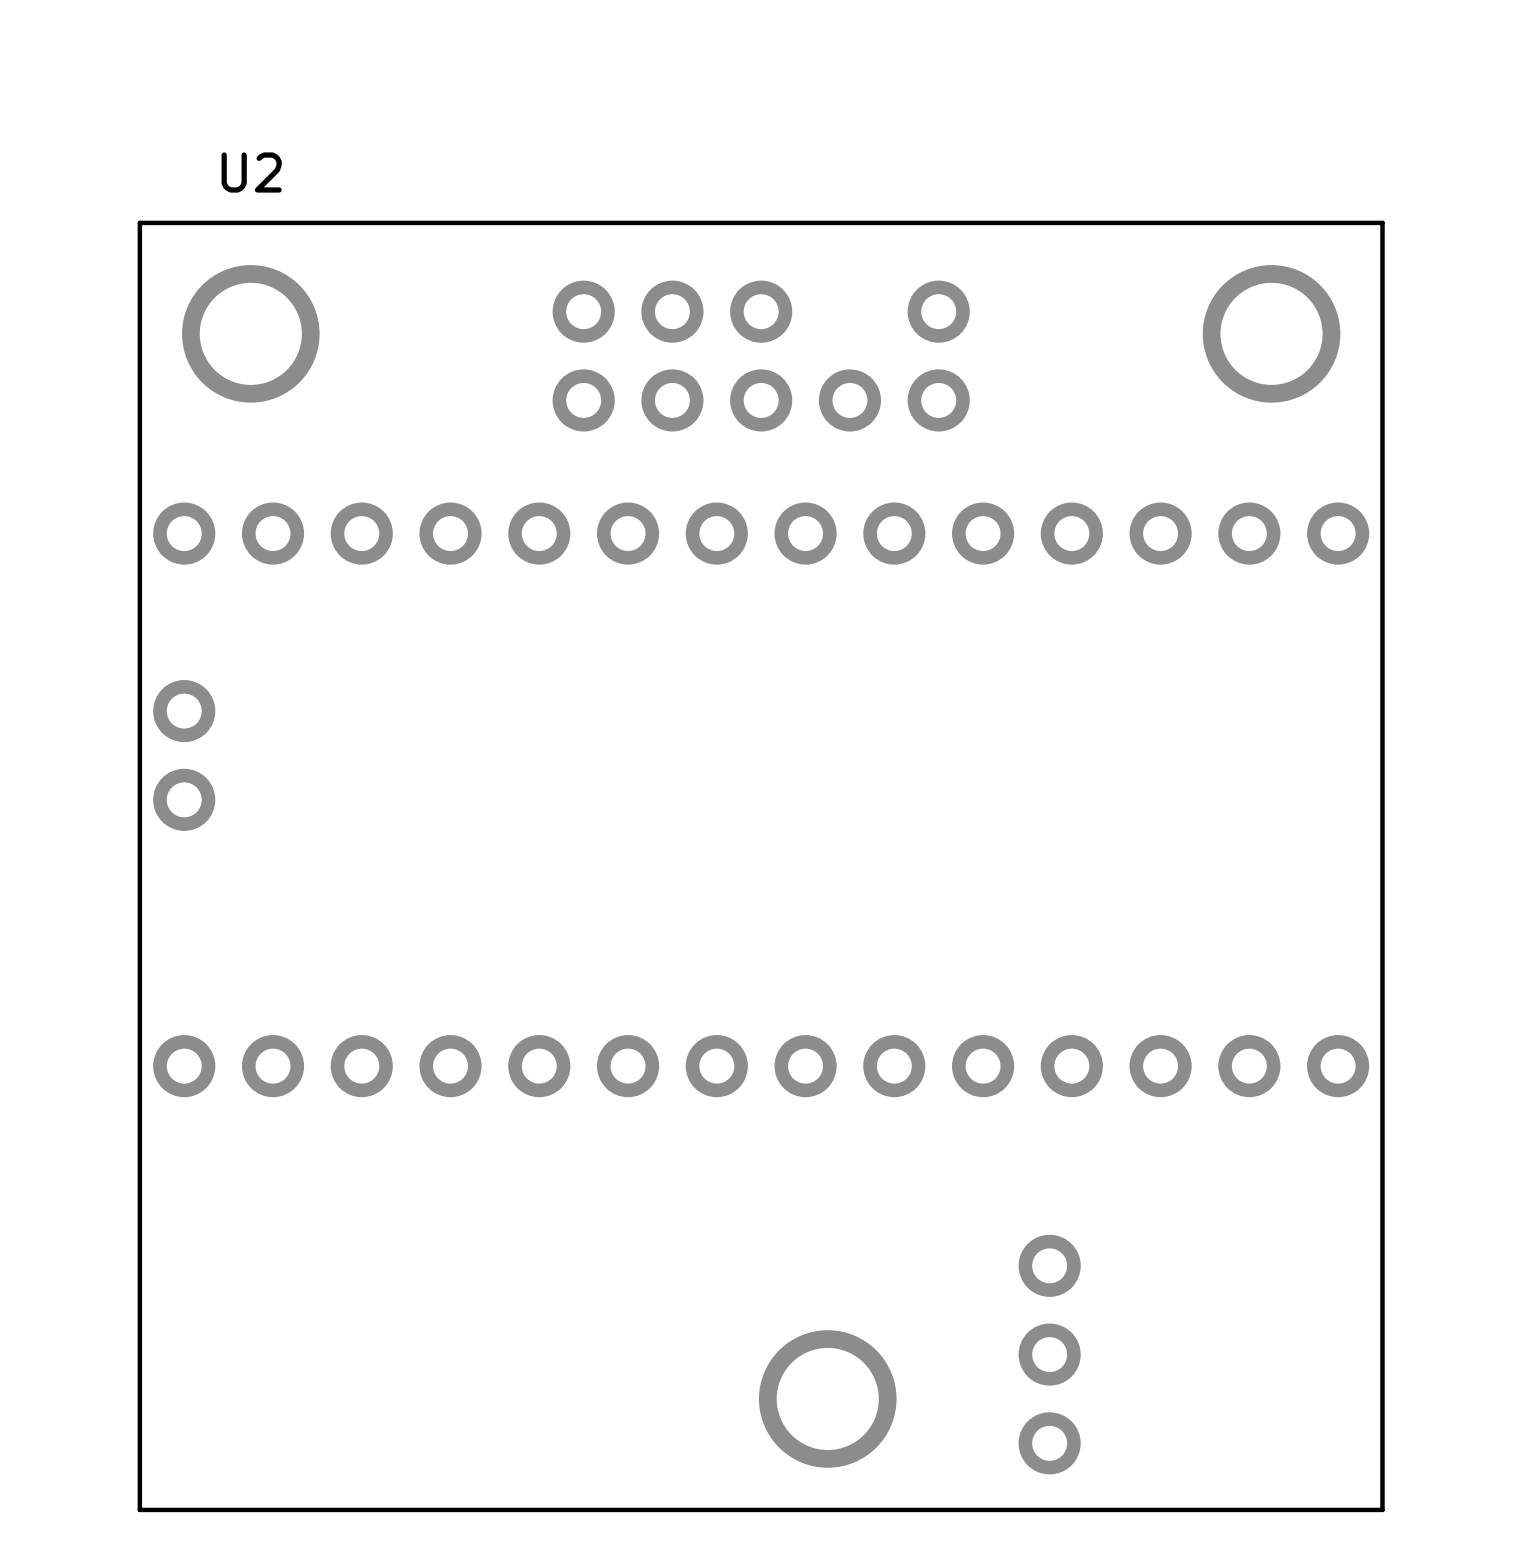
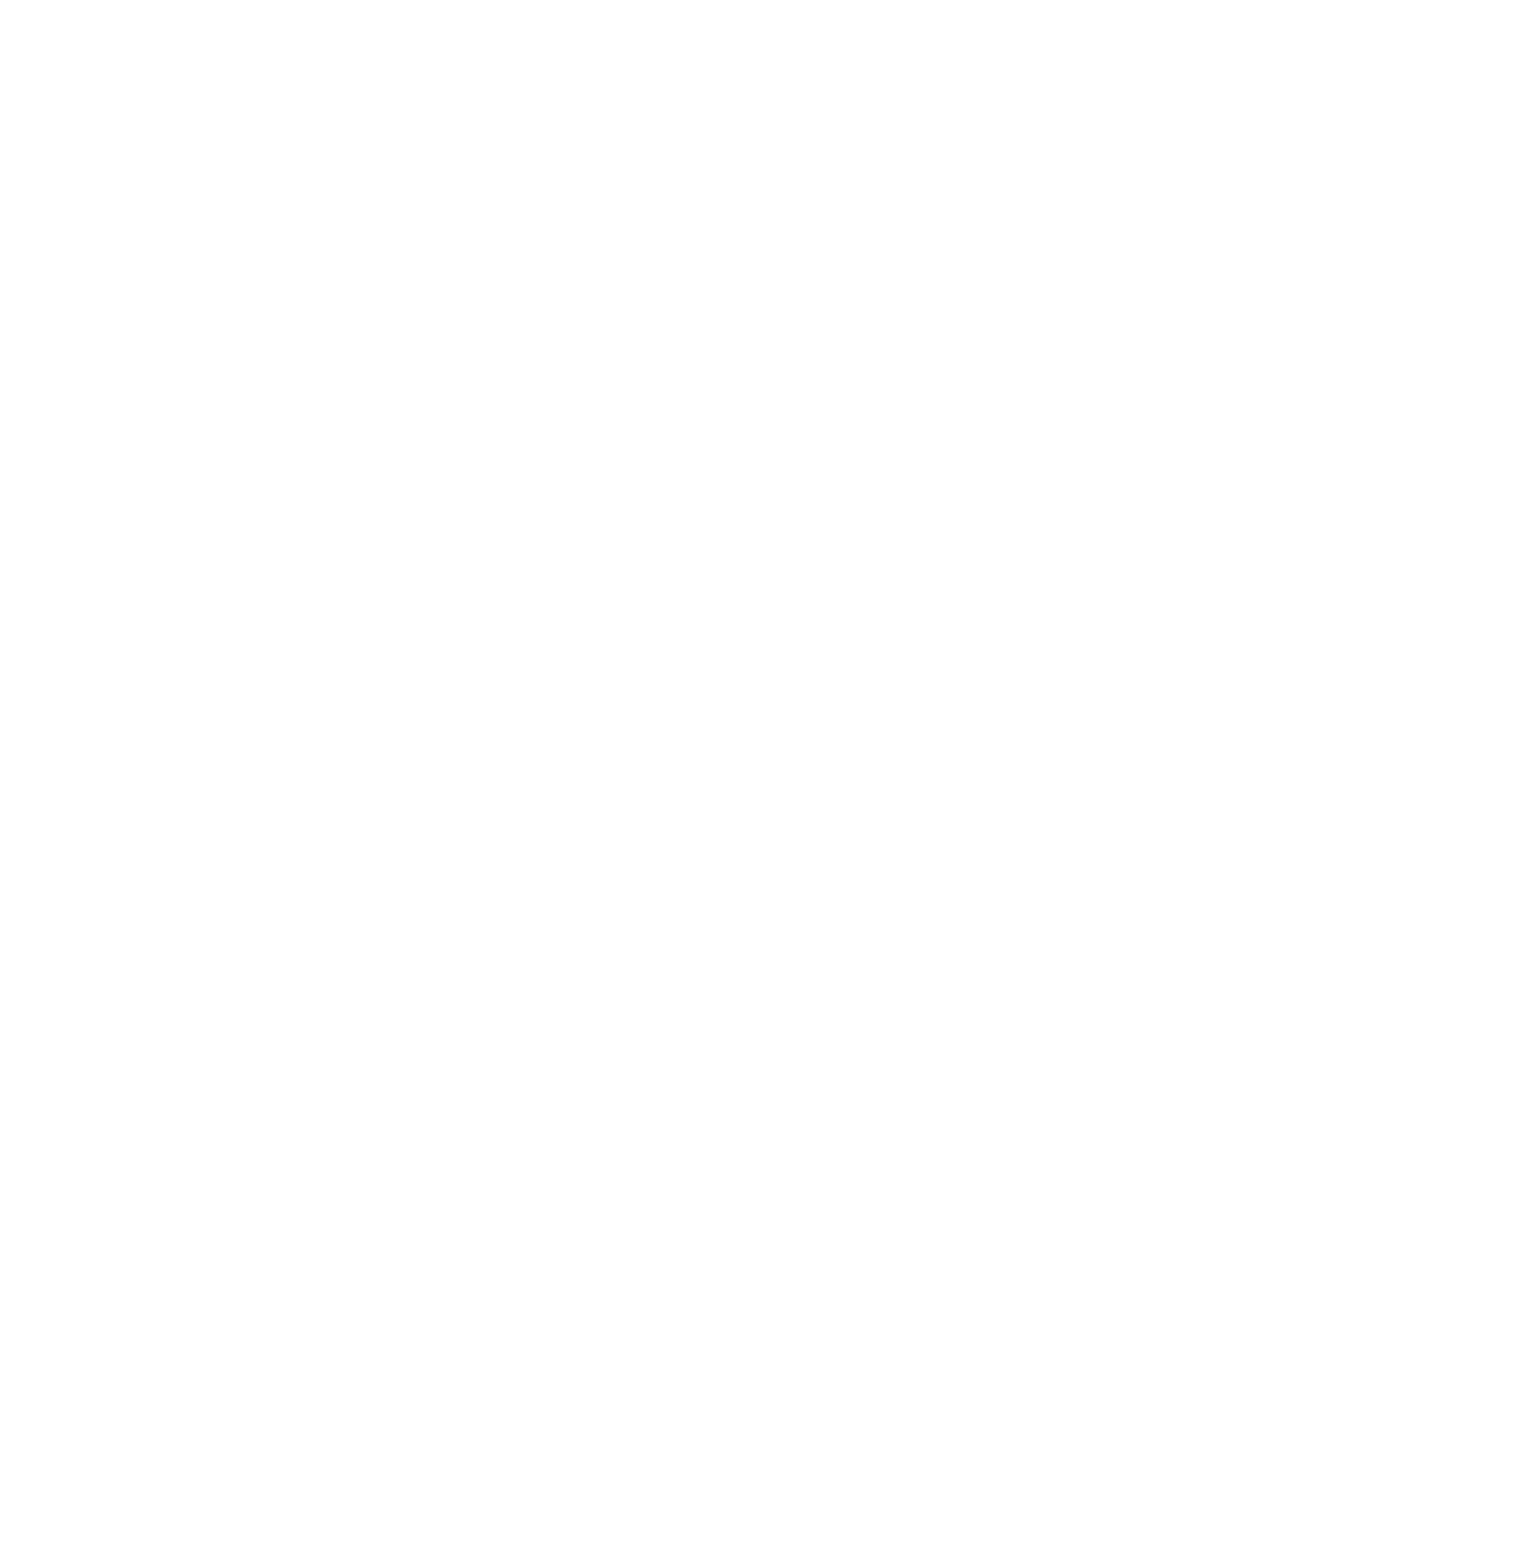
U2: (761, 866) -> none

